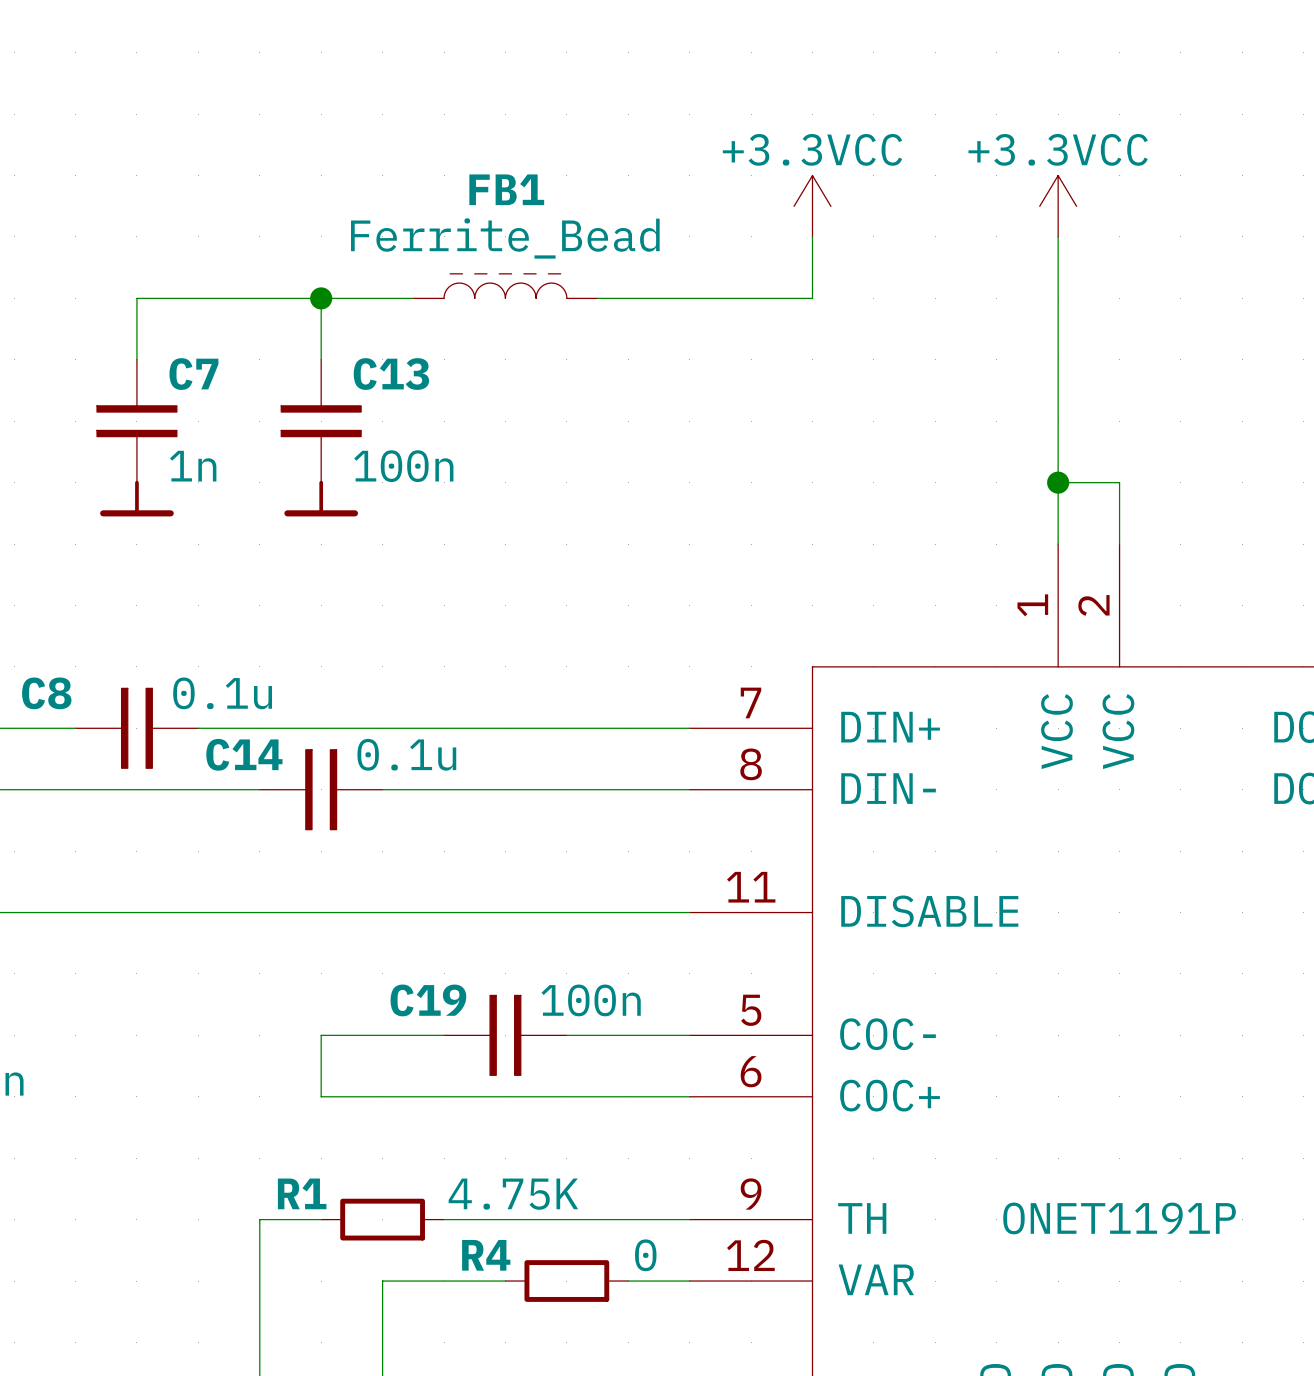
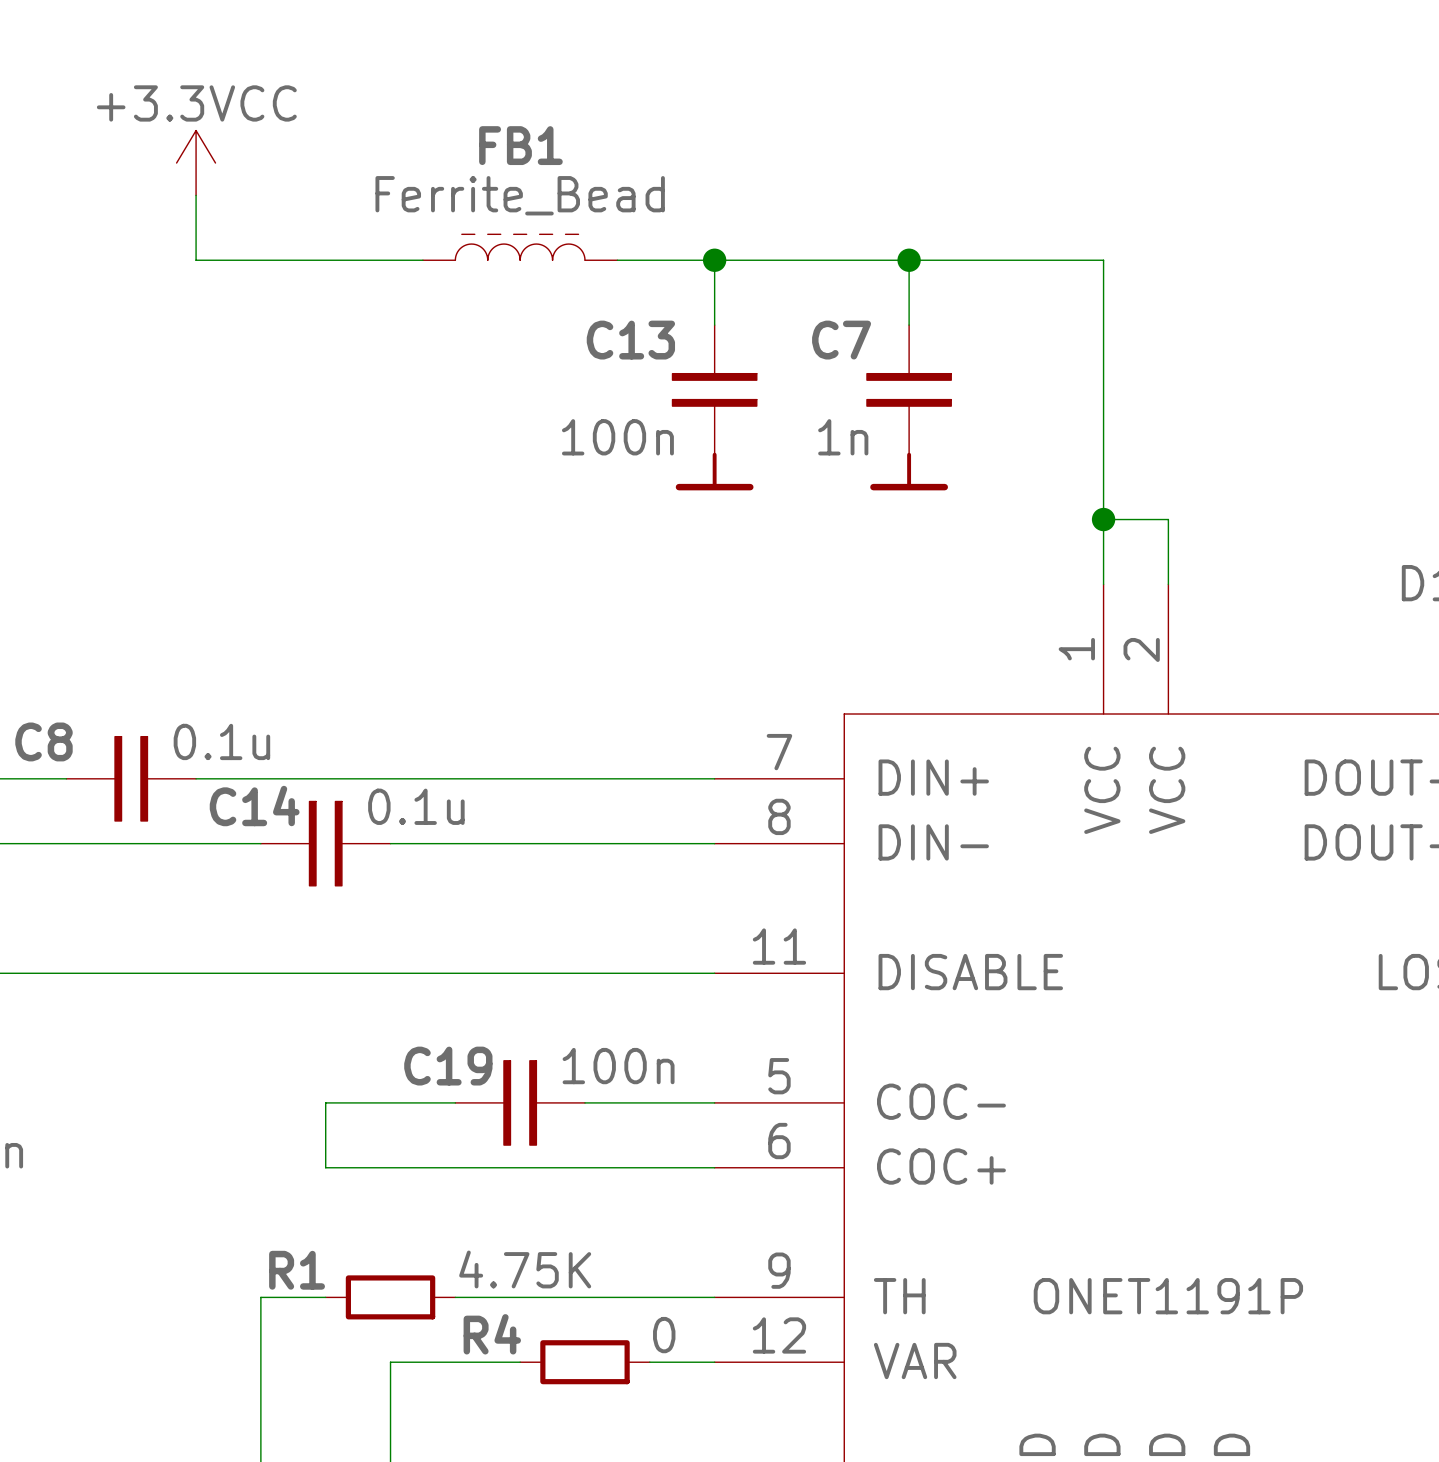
power symbol: none -> +3.3VCC (196, 163)
wire: none -> (196, 195) (196, 260) (422, 260)
power symbol: +3.3VCC (812, 206) -> none
power symbol: +3.3VCC (1058, 206) -> none
wire: none -> (617, 260) (1103, 260)
junction: none -> (714, 260)
wire: (812, 236) (812, 298) (597, 298) -> none
wire: none -> (909, 260) (909, 325)
junction: none -> (909, 260)
FB1 position: (505, 286) -> (520, 247)
wire: (321, 298) (321, 359) -> (714, 260) (714, 325)
junction: (321, 298) -> none
wire: (413, 298) (136, 298) (136, 359) -> none
C7 name position: C7 (193, 374) -> C7 (841, 340)
C13 name position: C13 (391, 374) -> C13 (630, 340)
C7 position: (136, 421) -> (909, 389)
C13 position: (321, 421) -> (714, 389)
power symbol: none -> (714, 471)
power symbol: none -> (909, 471)
C7 value position: 1n (193, 466) -> 1n (843, 437)
C13 value position: 100n (403, 466) -> 100n (617, 437)
power symbol: (136, 498) -> none
power symbol: (321, 498) -> none

